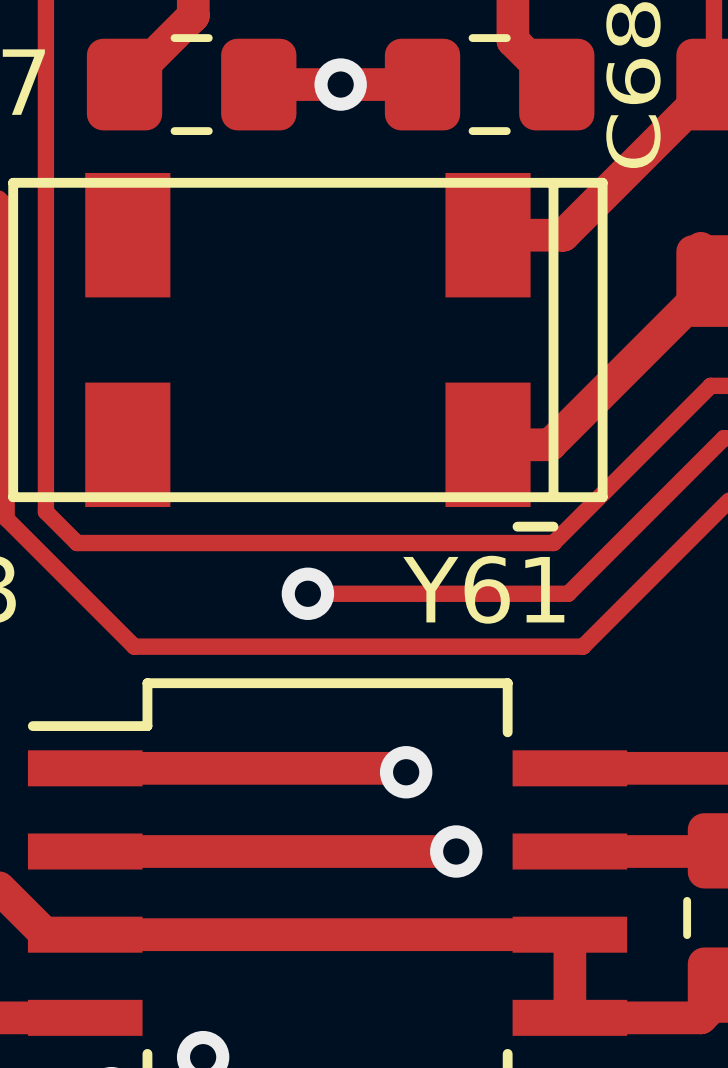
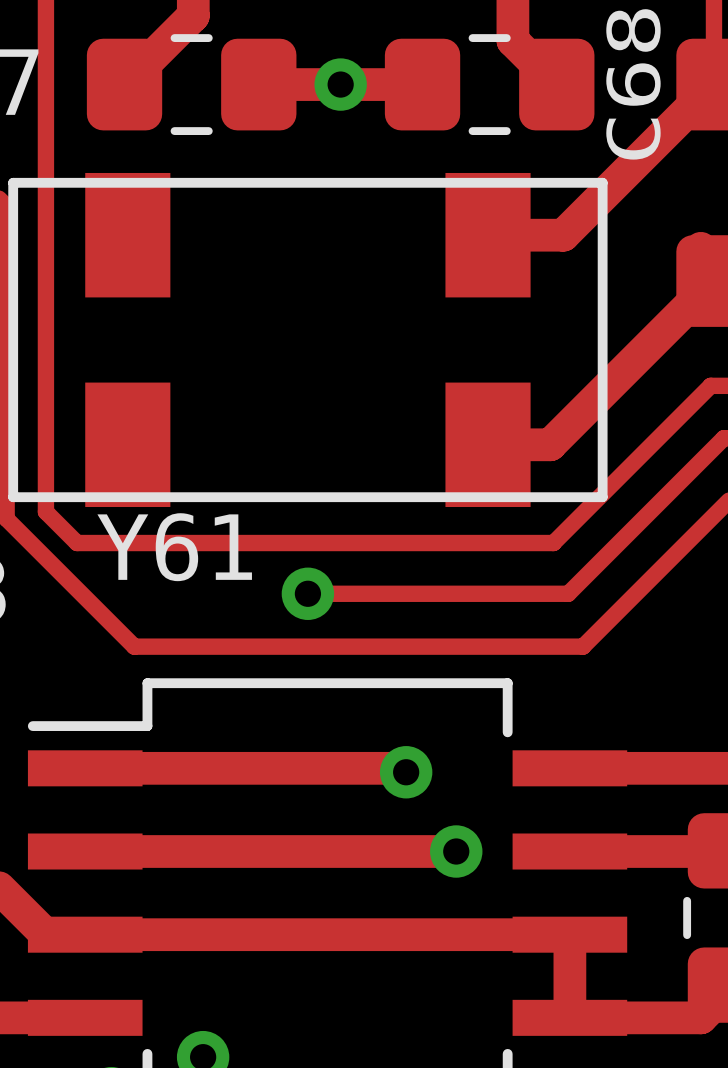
Y61 footprint: [8, 172, 608, 532] -> [8, 172, 608, 508]
Y61 name position: Y61 (483, 589) -> Y61 (174, 547)

